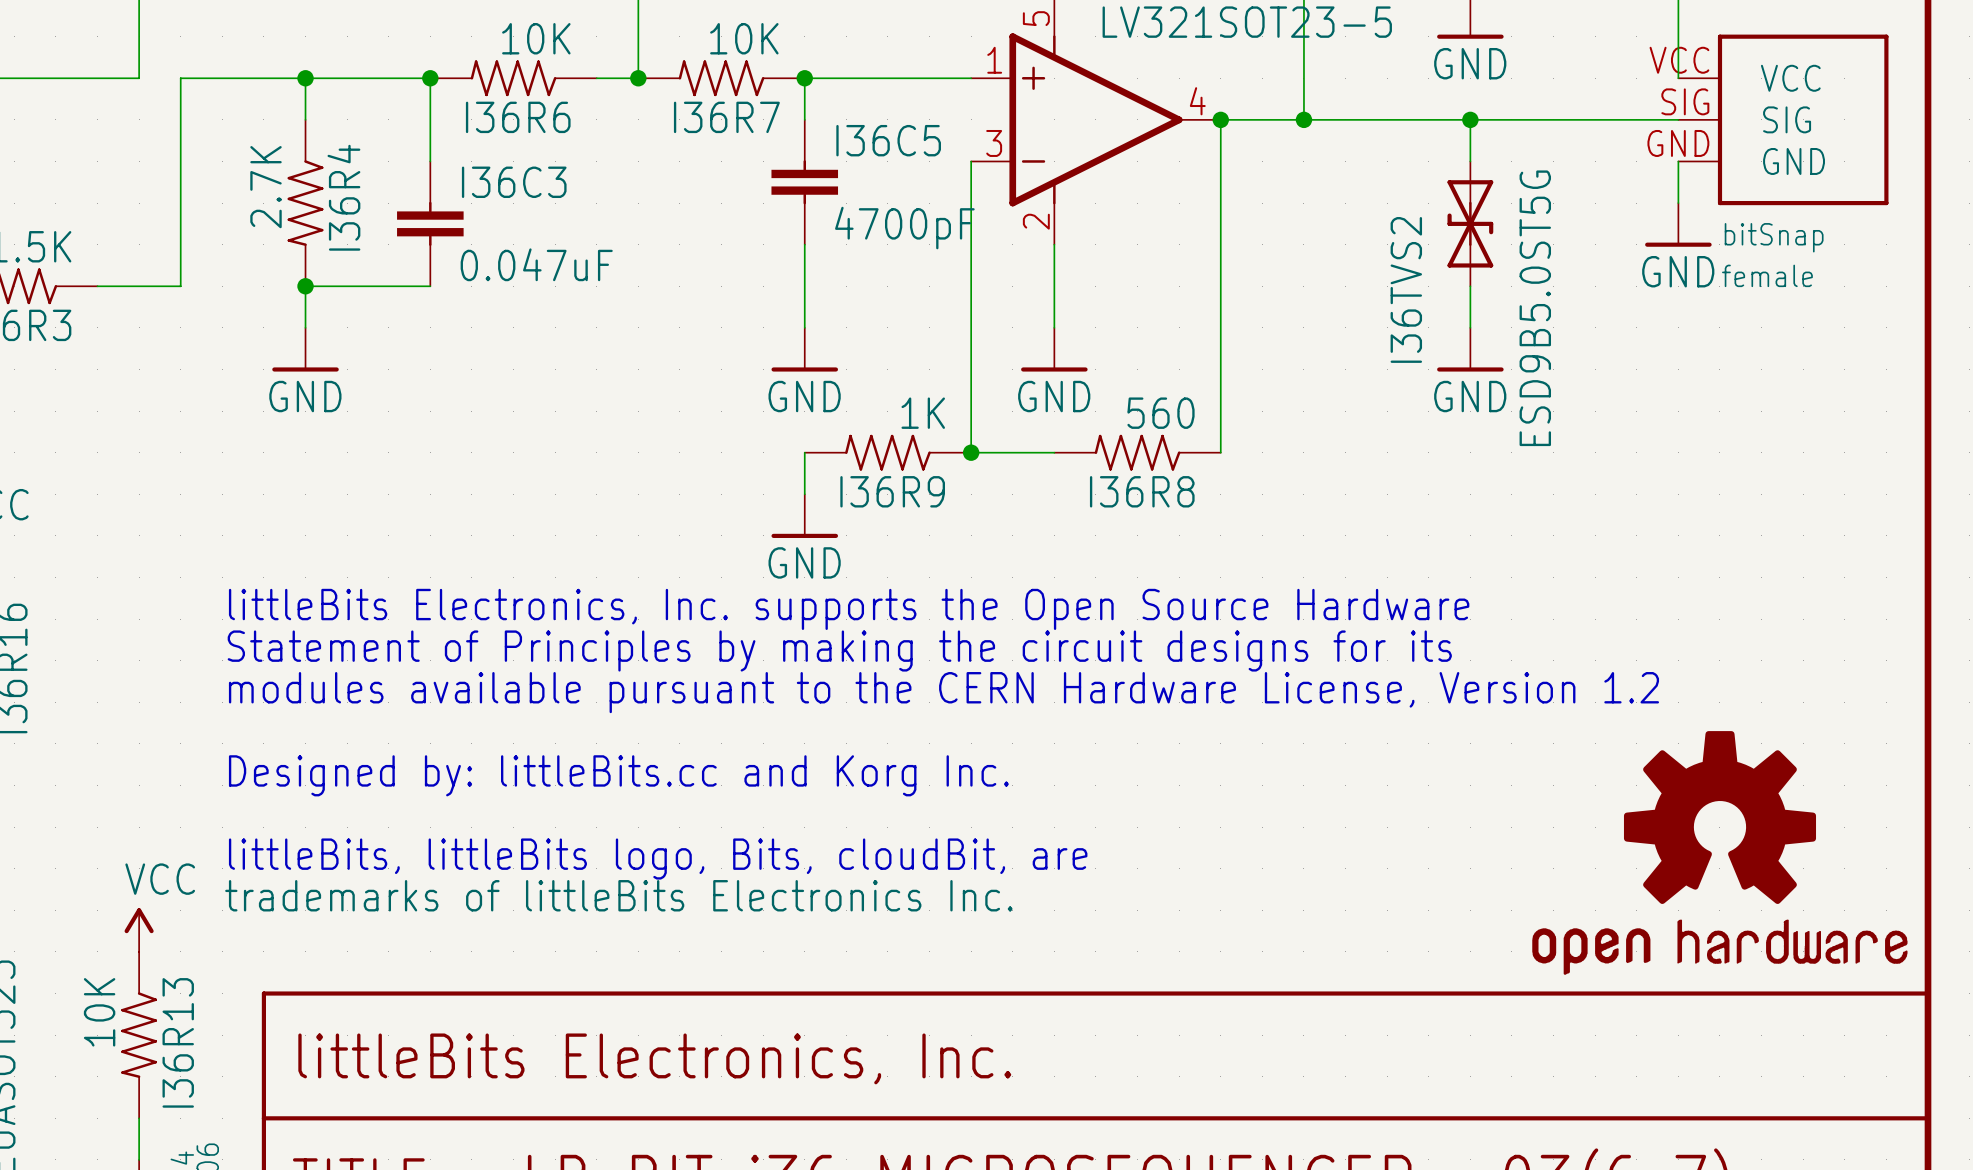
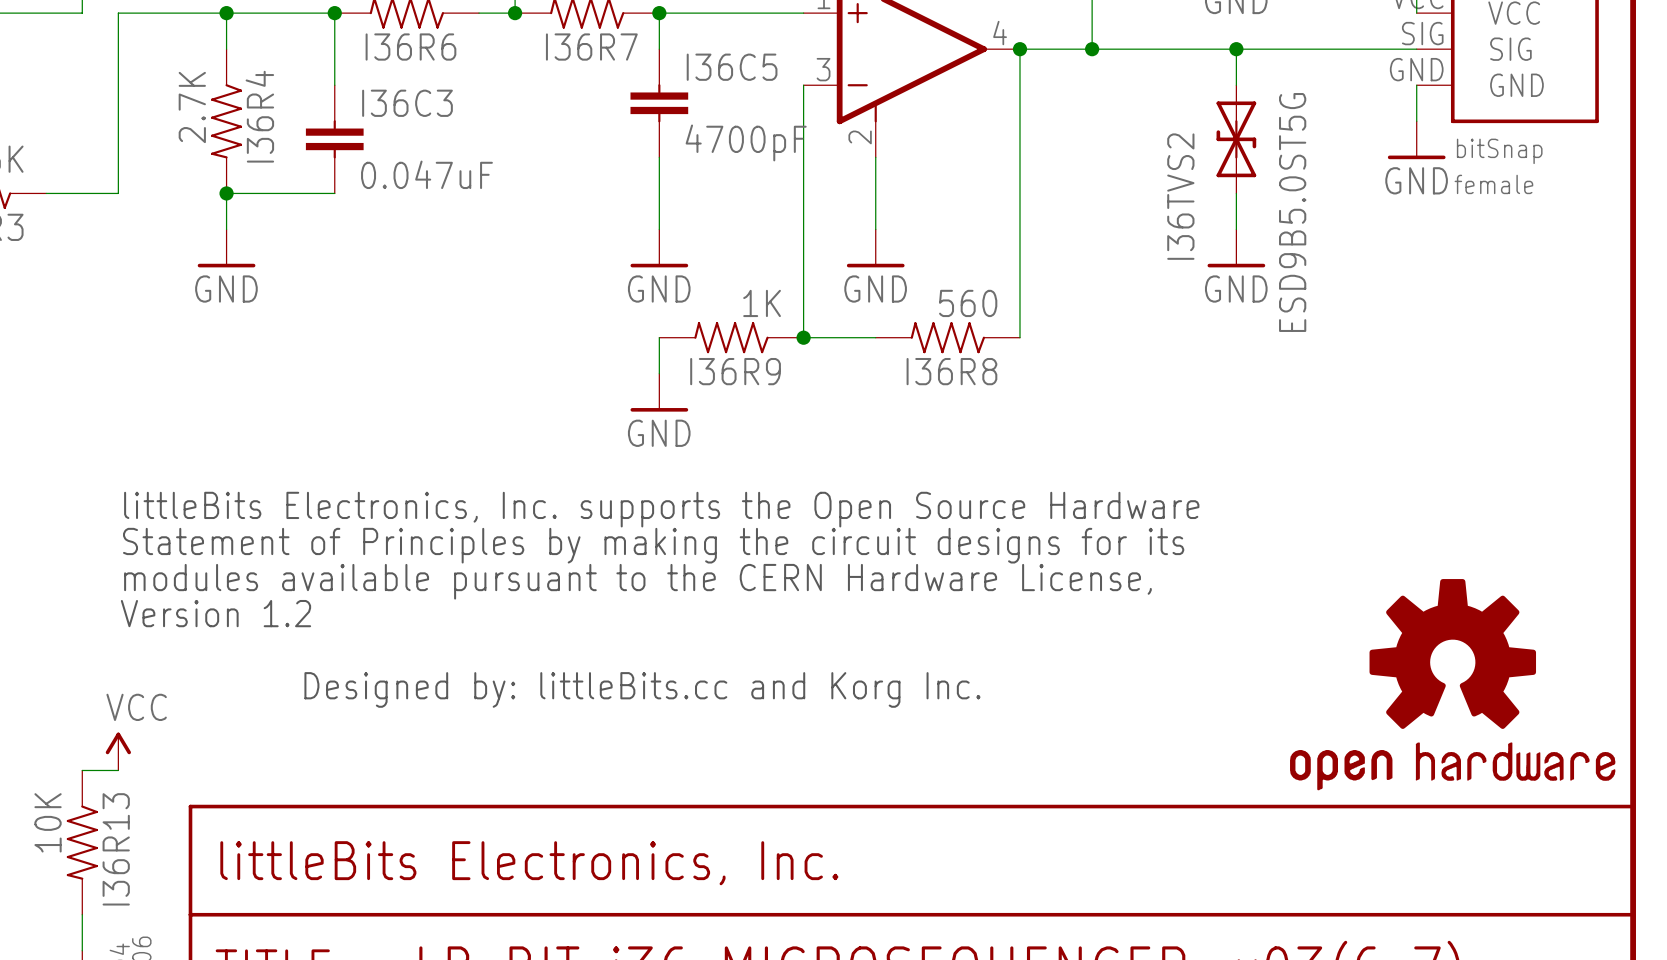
part: (942, 750) -> none
part: none -> (660, 599)
power symbol position: VCC (139, 930) -> VCC (118, 751)
wire: none -> (82, 770) (118, 770)

